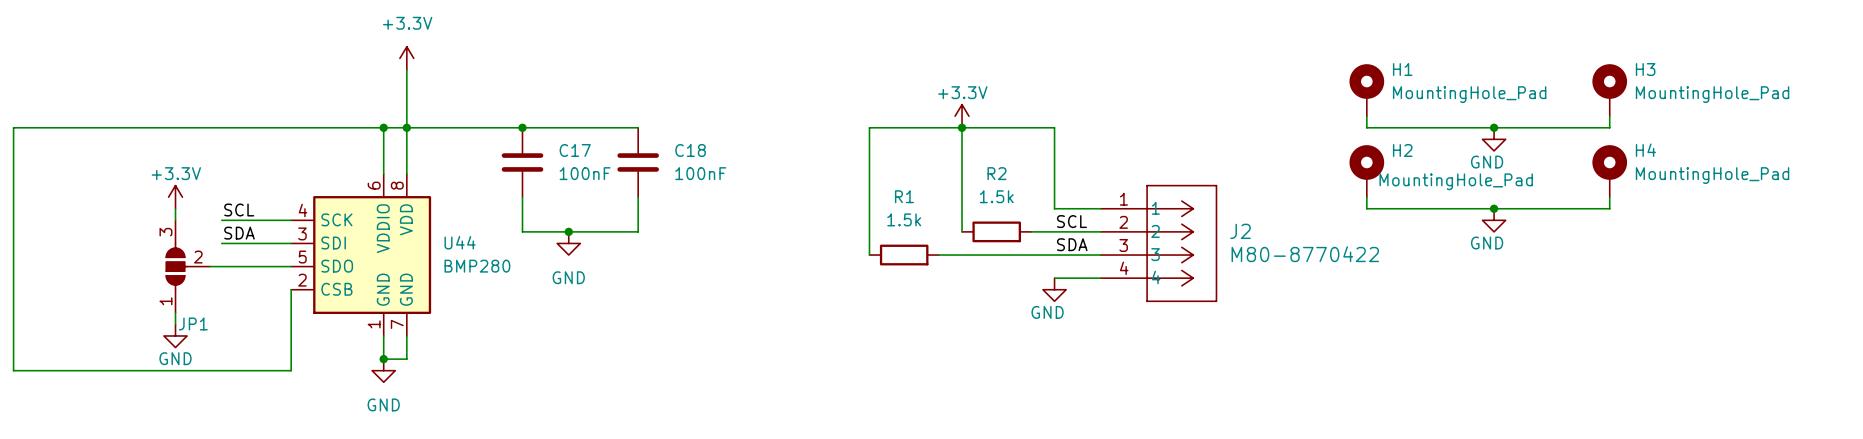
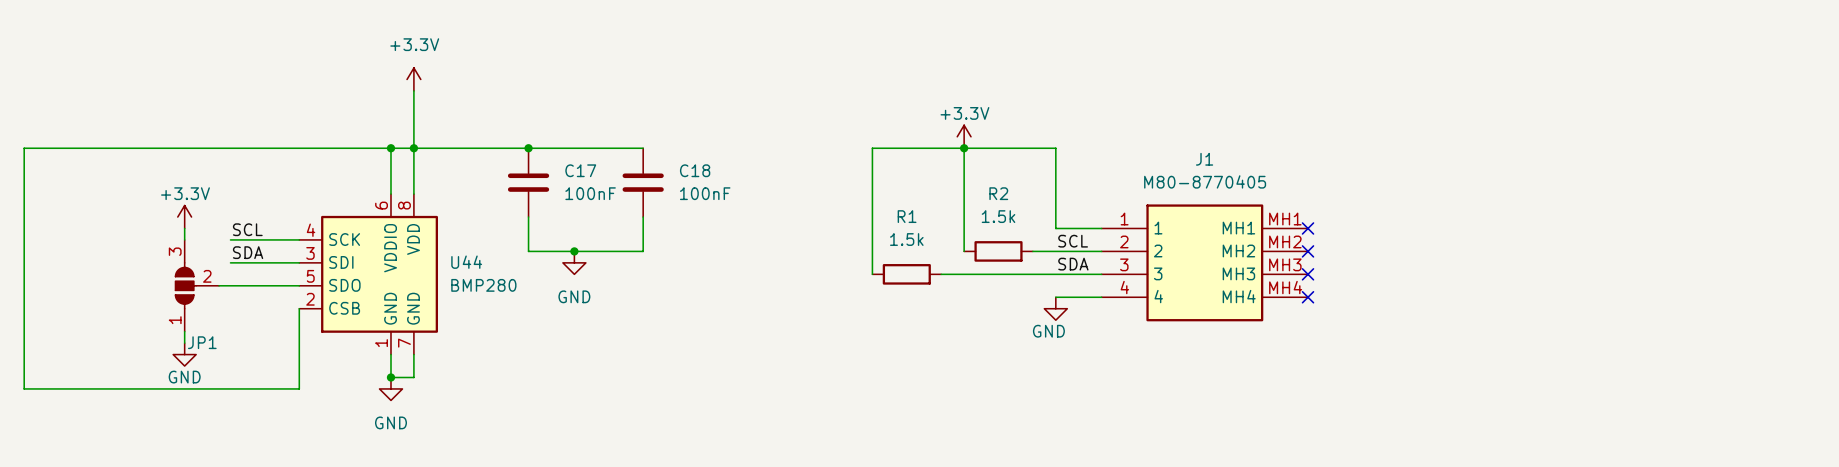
H1: MountingHole_Pad (1366, 90) -> none
H3: MountingHole_Pad (1609, 90) -> none
wire: (1366, 116) (1366, 127) (1609, 127) (1609, 116) -> none
junction: (1494, 127) -> none
power symbol: GND (1494, 139) -> none
H2: MountingHole_Pad (1366, 171) -> none
H4: MountingHole_Pad (1609, 171) -> none
wire: (1366, 197) (1366, 208) (1609, 208) (1609, 197) -> none
no-connect mark: none -> (1308, 228)
junction: (1494, 208) -> none
power symbol: GND (1494, 220) -> none
no-connect mark: none -> (1308, 251)
J2: M80-8770422 (1158, 243) -> none
J1: none -> M80-8770405 (1204, 262)
no-connect mark: none -> (1308, 274)
no-connect mark: none -> (1308, 297)

